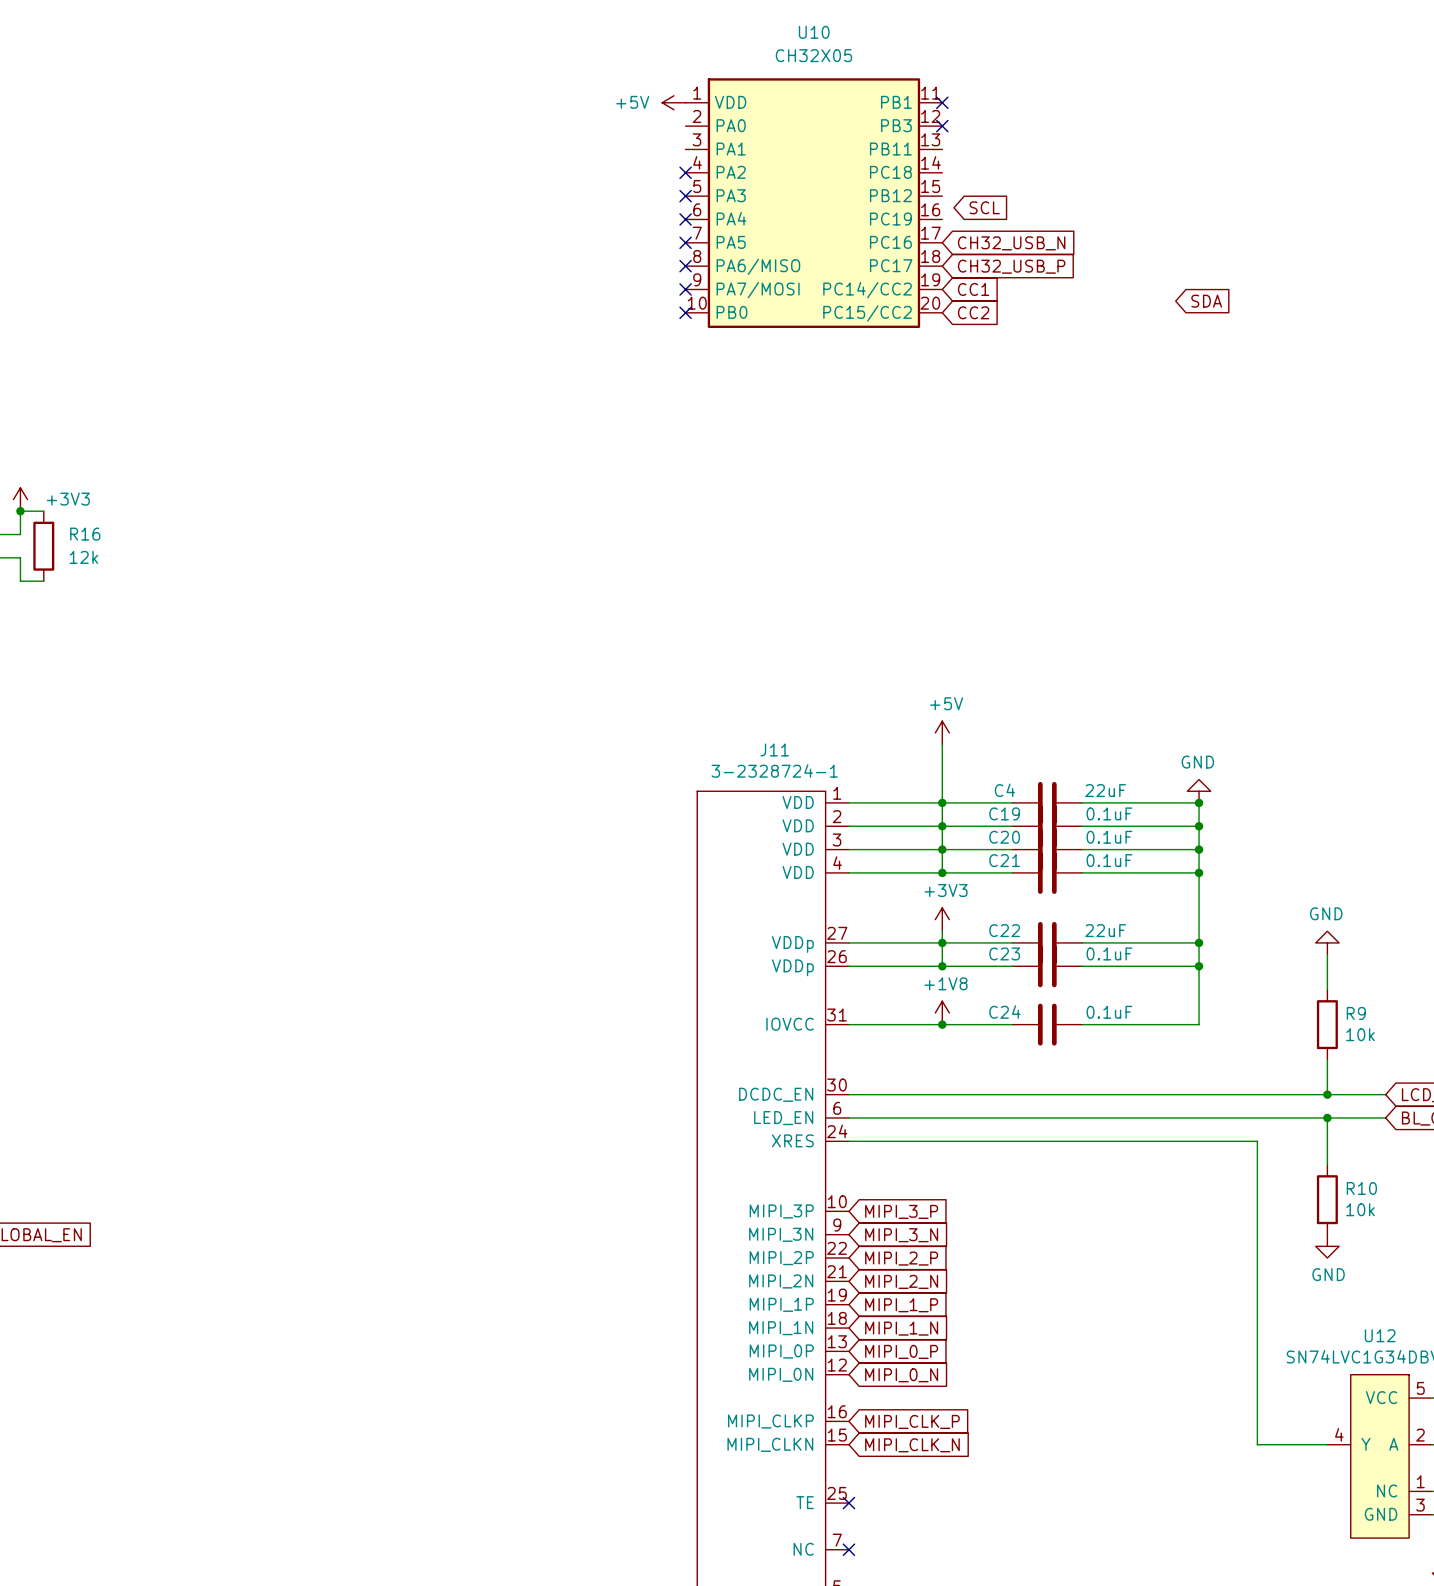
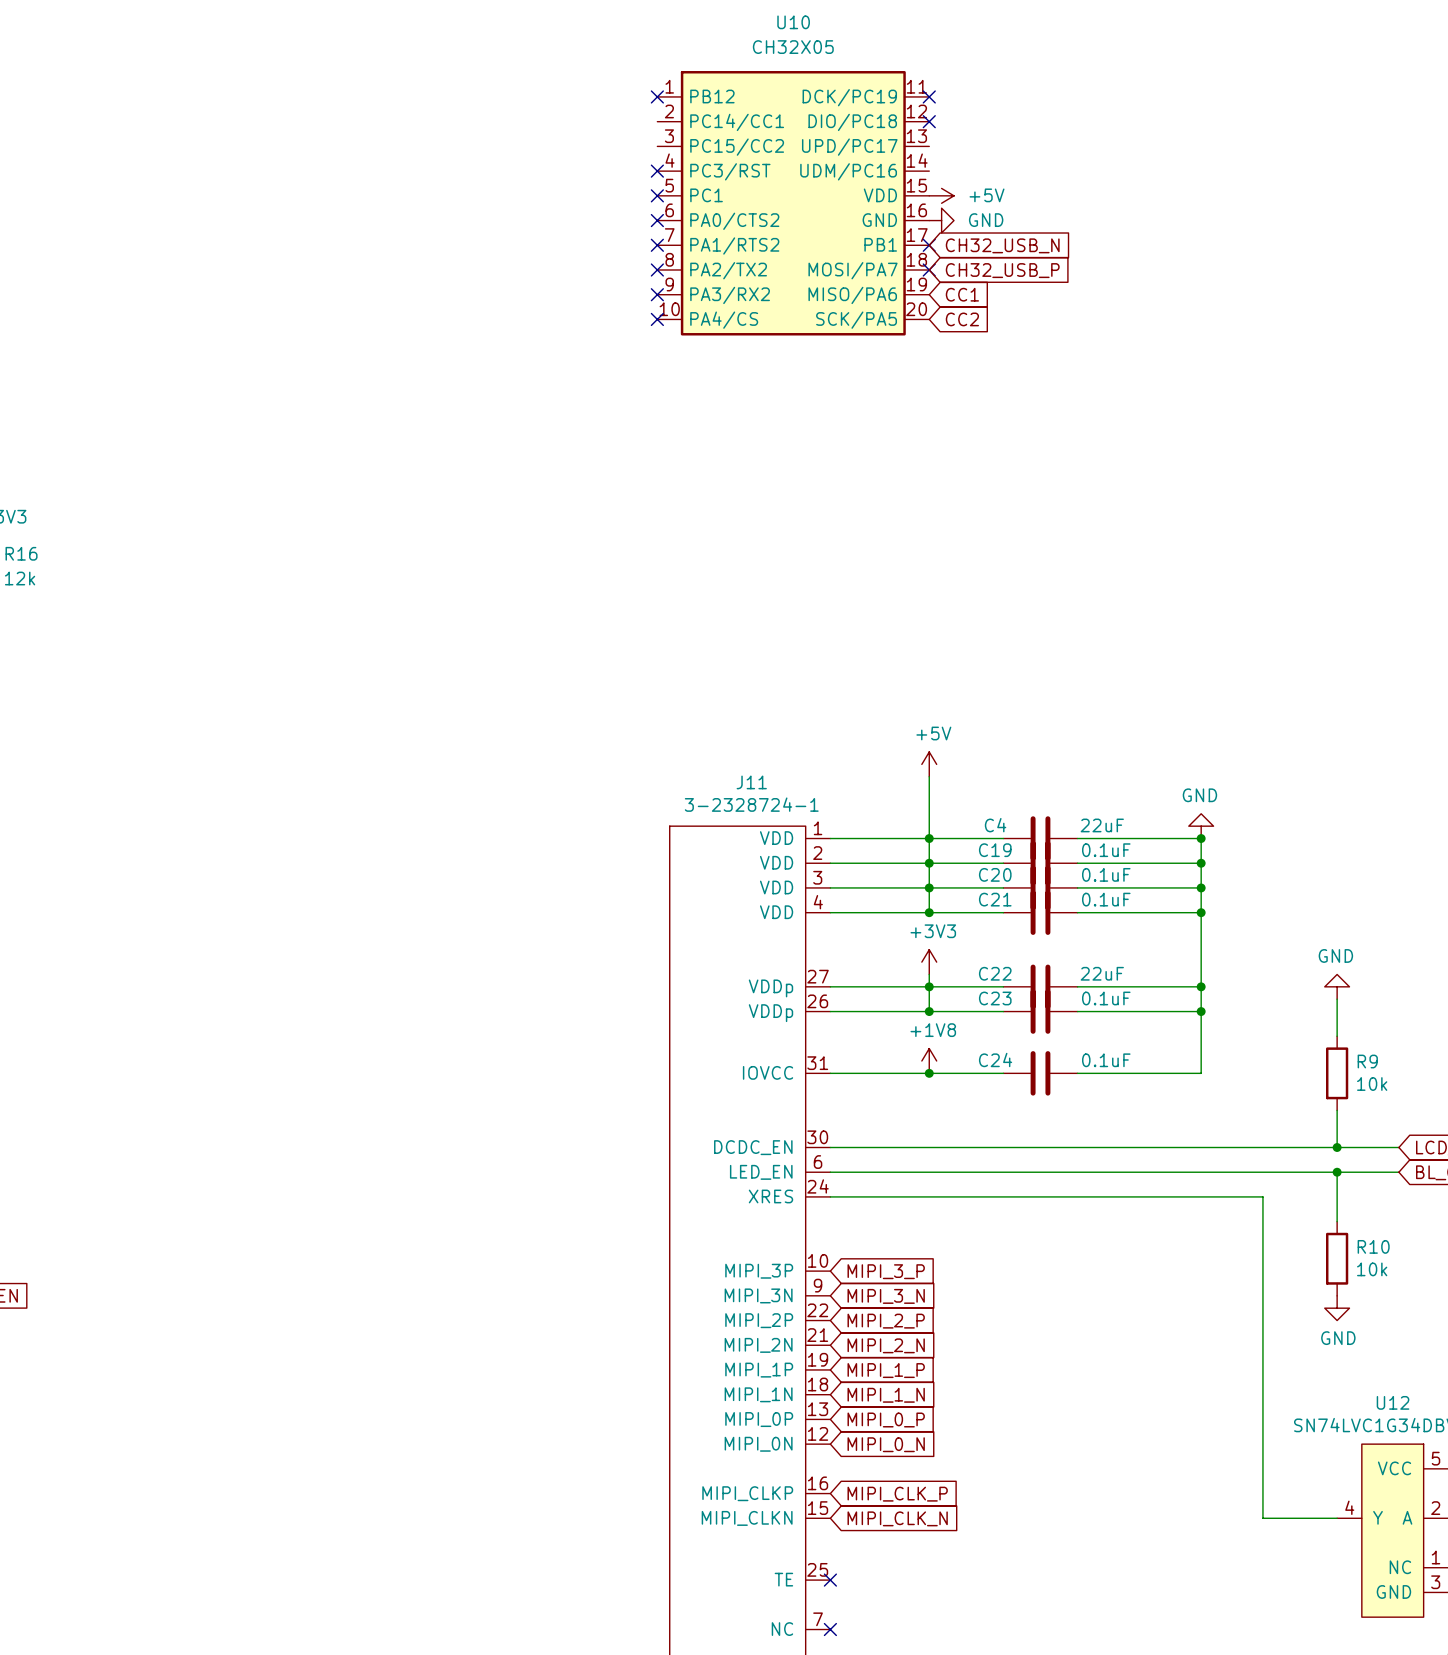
U10 symbol: [685, 78, 943, 328] -> [657, 71, 930, 336]
power symbol: +5V (673, 102) -> none
no-connect mark: none -> (657, 96)
power symbol: none -> +5V (941, 195)
global label: SCL (984, 207) -> none
power symbol: none -> GND (941, 220)
no-connect mark: none -> (929, 245)
no-connect mark: none -> (929, 269)
global label: SDA (1206, 301) -> none

